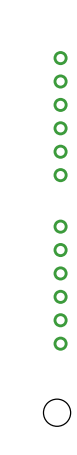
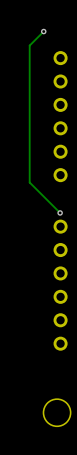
track: none -> (43, 31) (29, 45) (29, 182) (60, 212)
via: none -> (43, 31)
via: none -> (60, 212)

